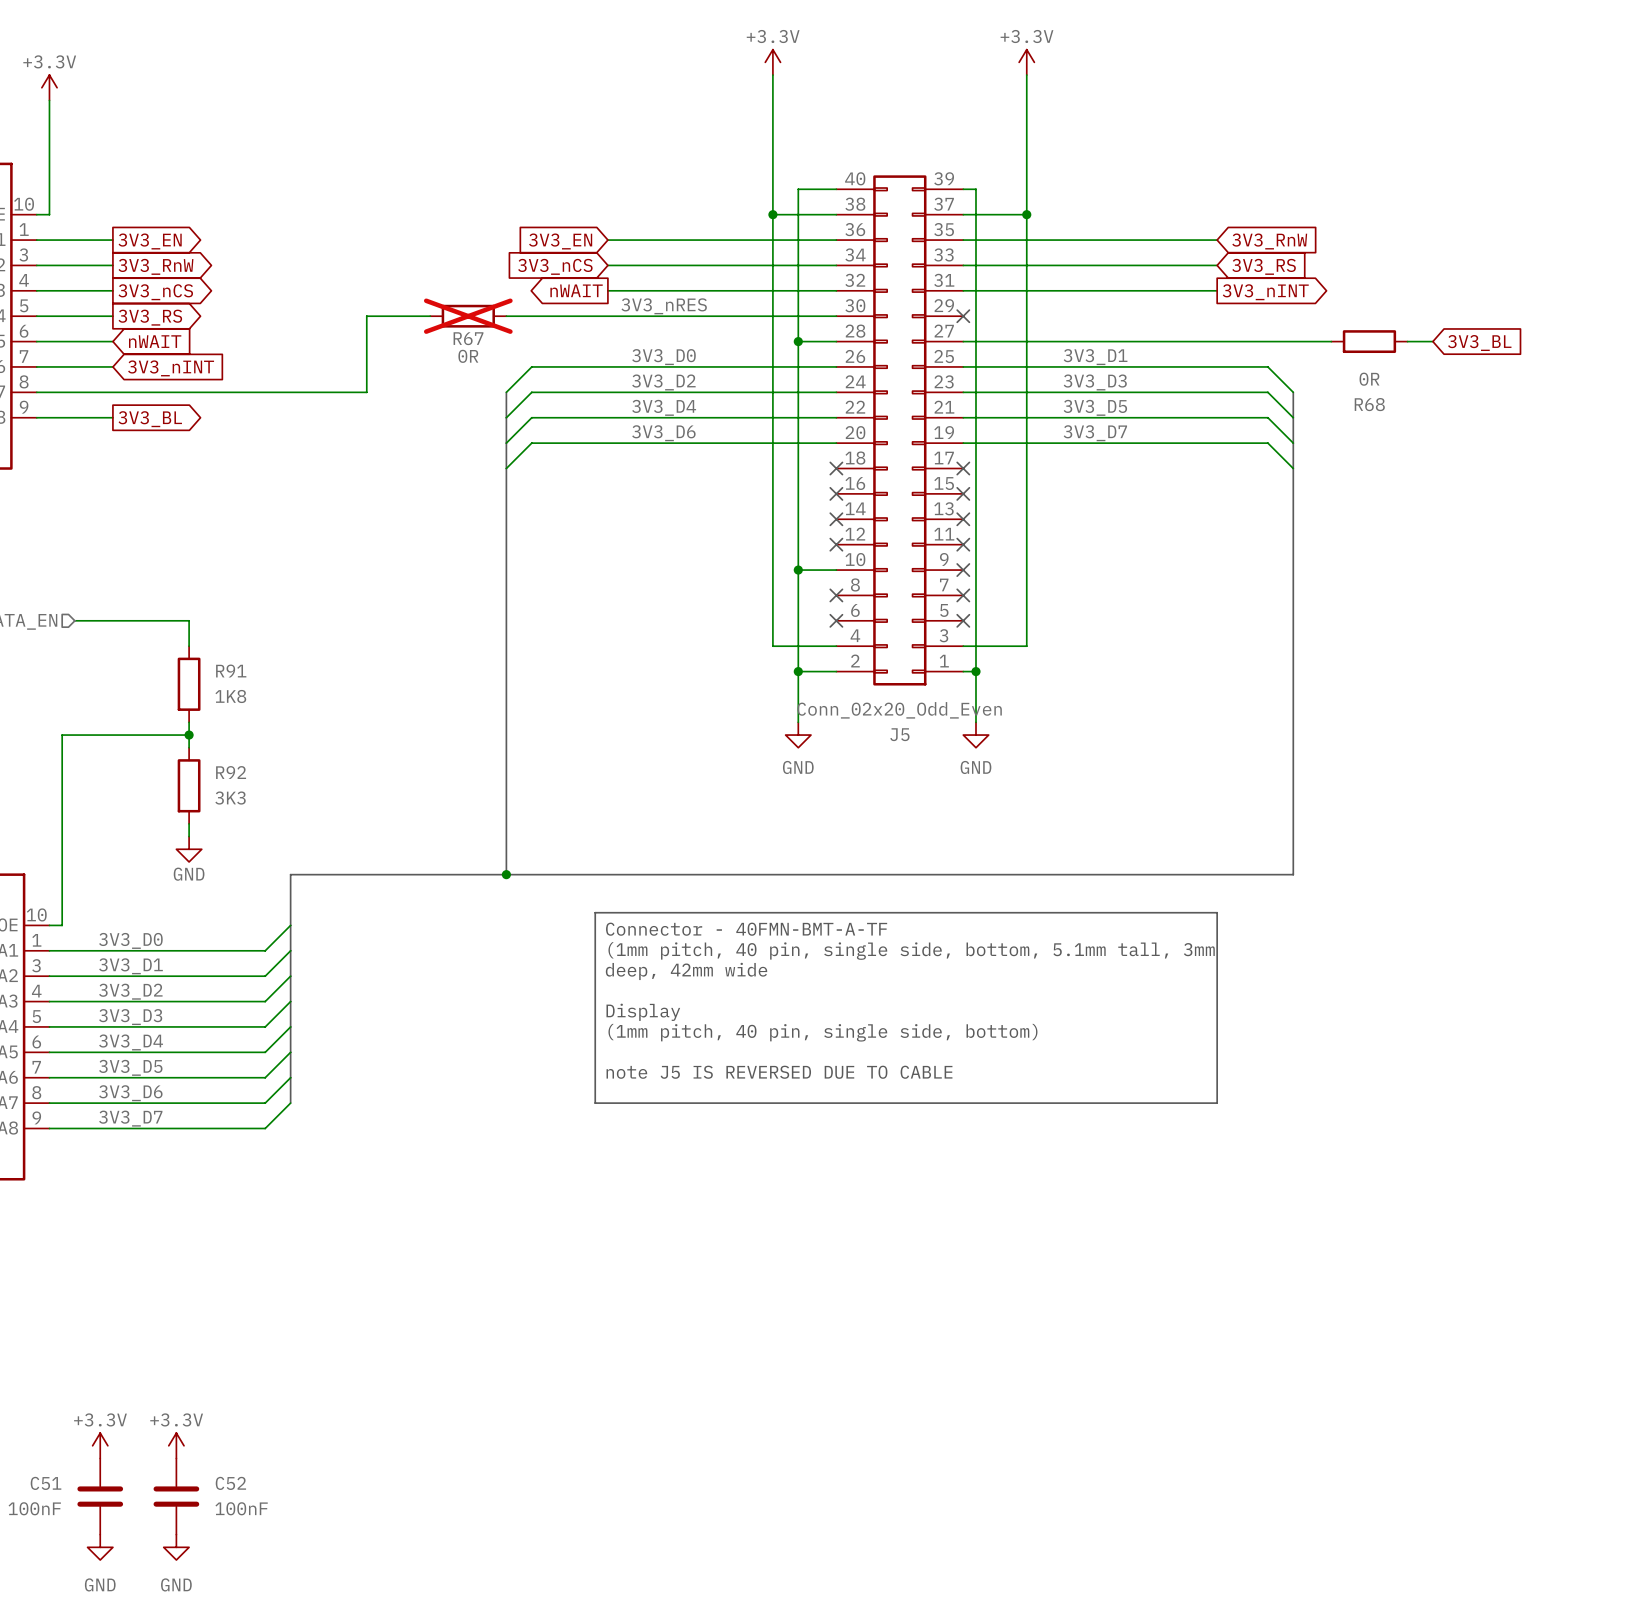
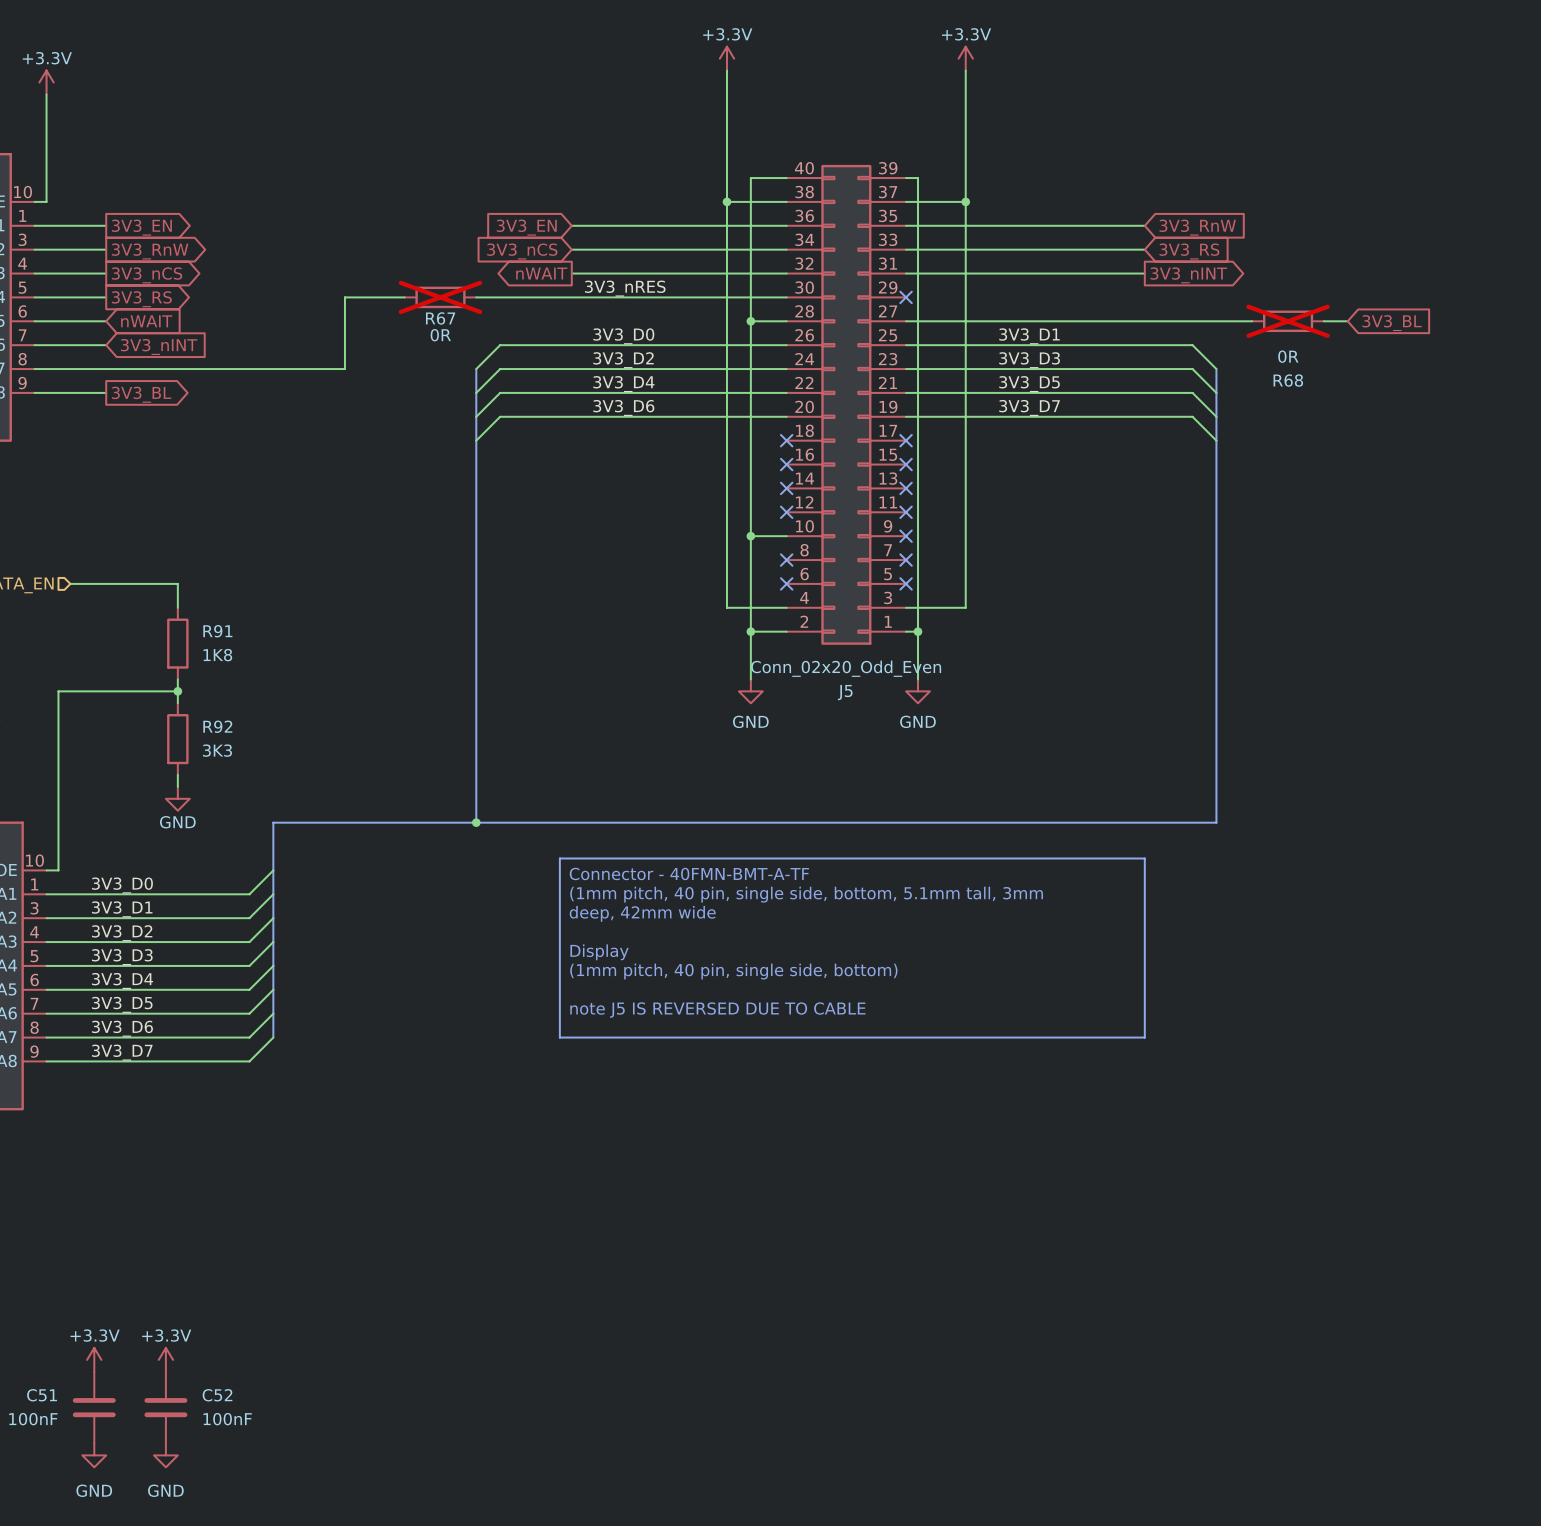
R68 do-not-place cross: none -> (1288, 321)

